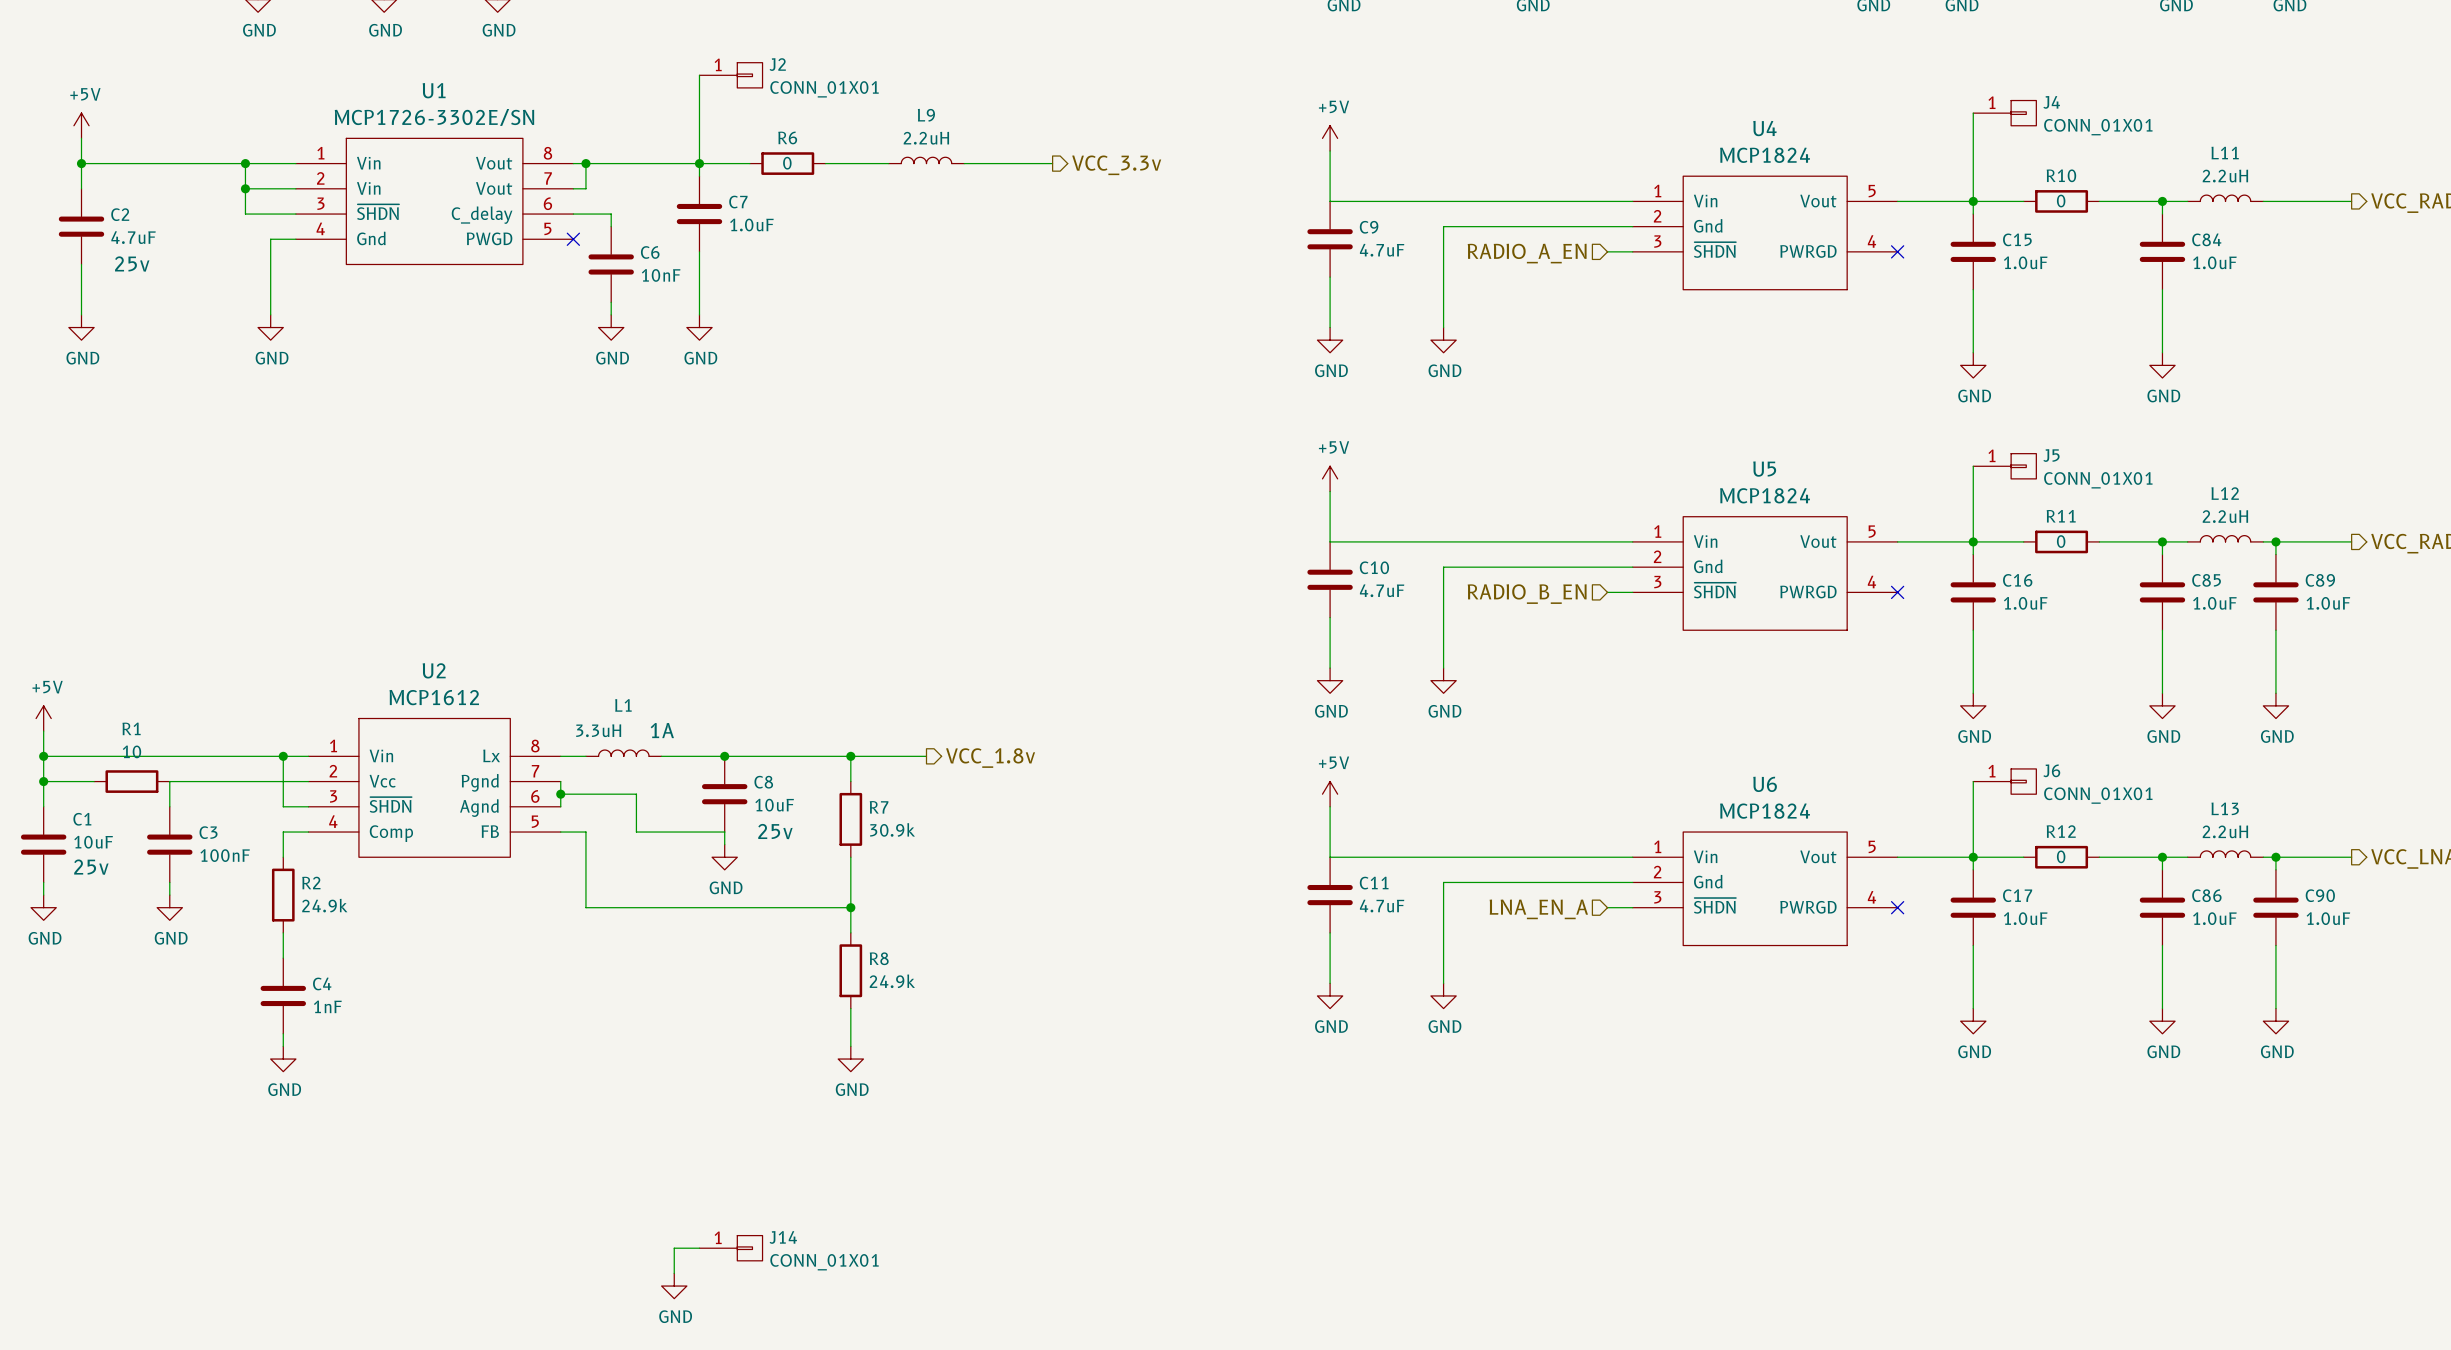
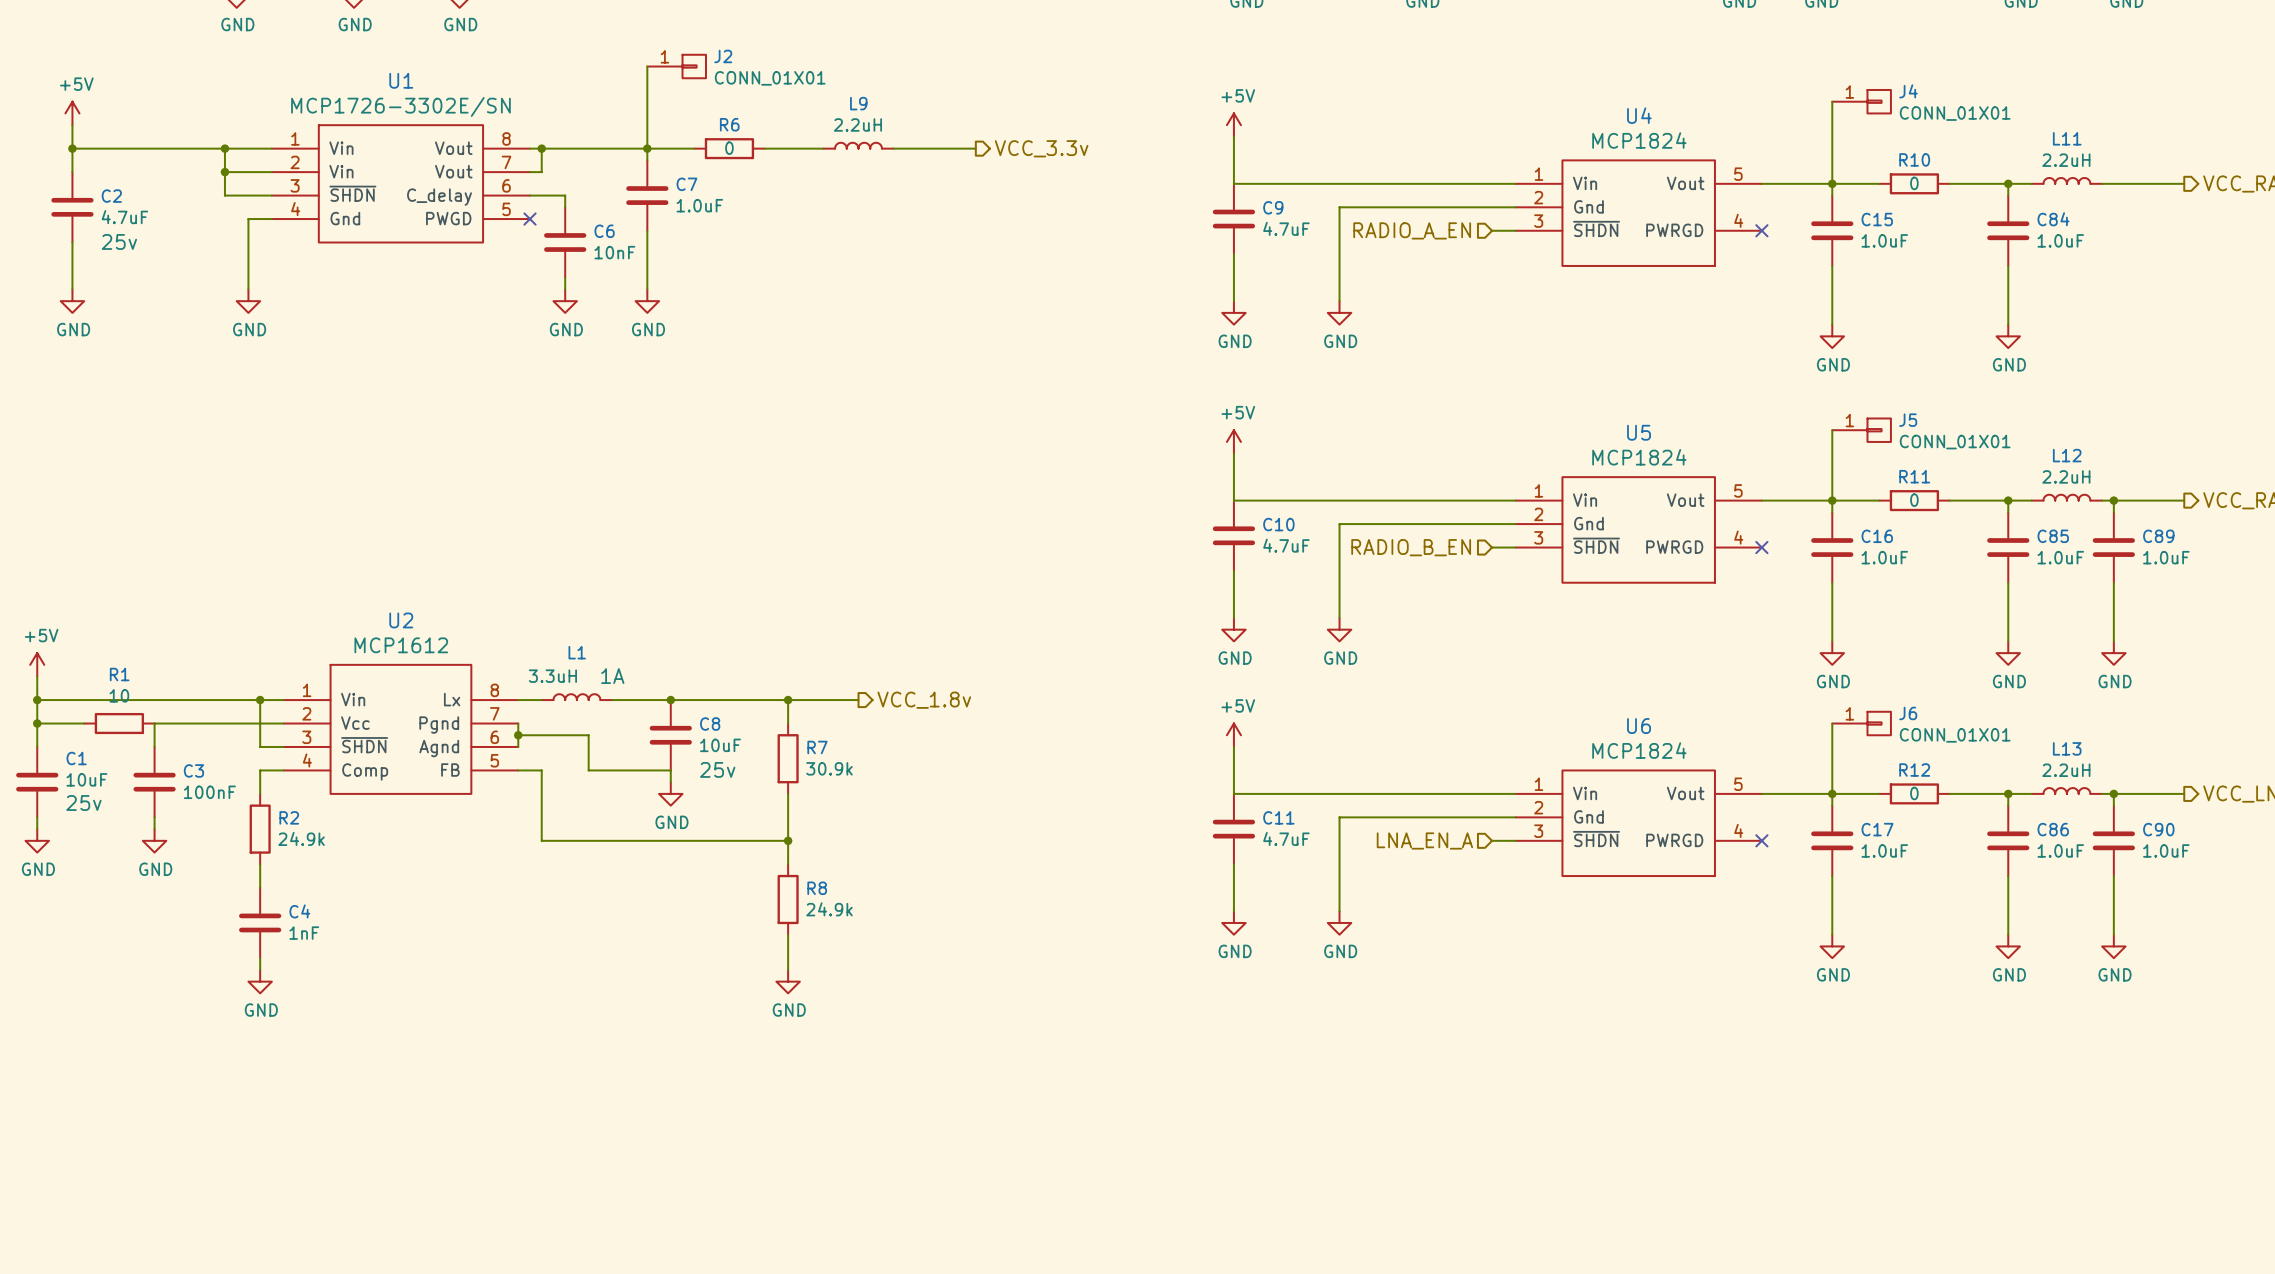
wire: (699, 1248) (674, 1248) (674, 1273) -> none
J14: CONN_01X01 (731, 1248) -> none
power symbol: GND (674, 1286) -> none

